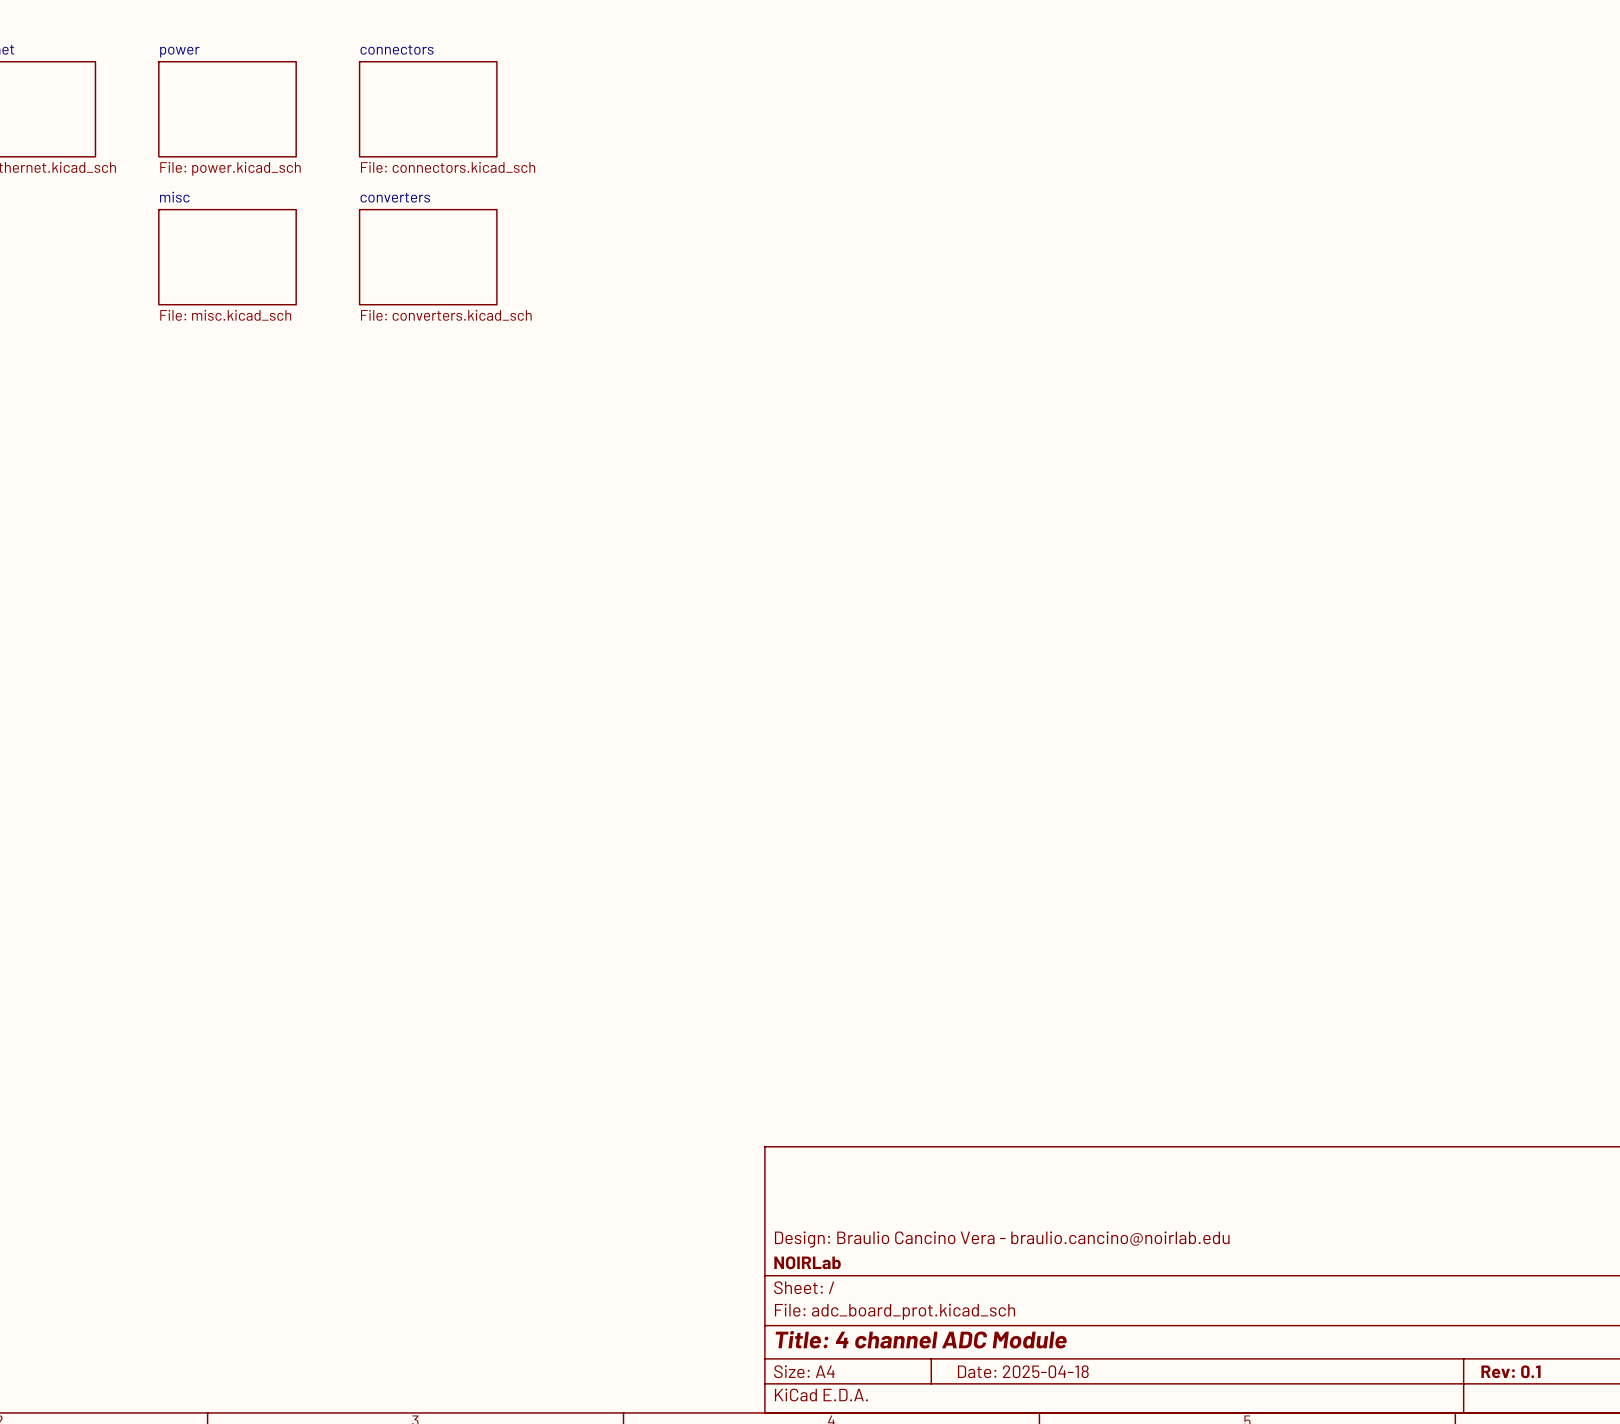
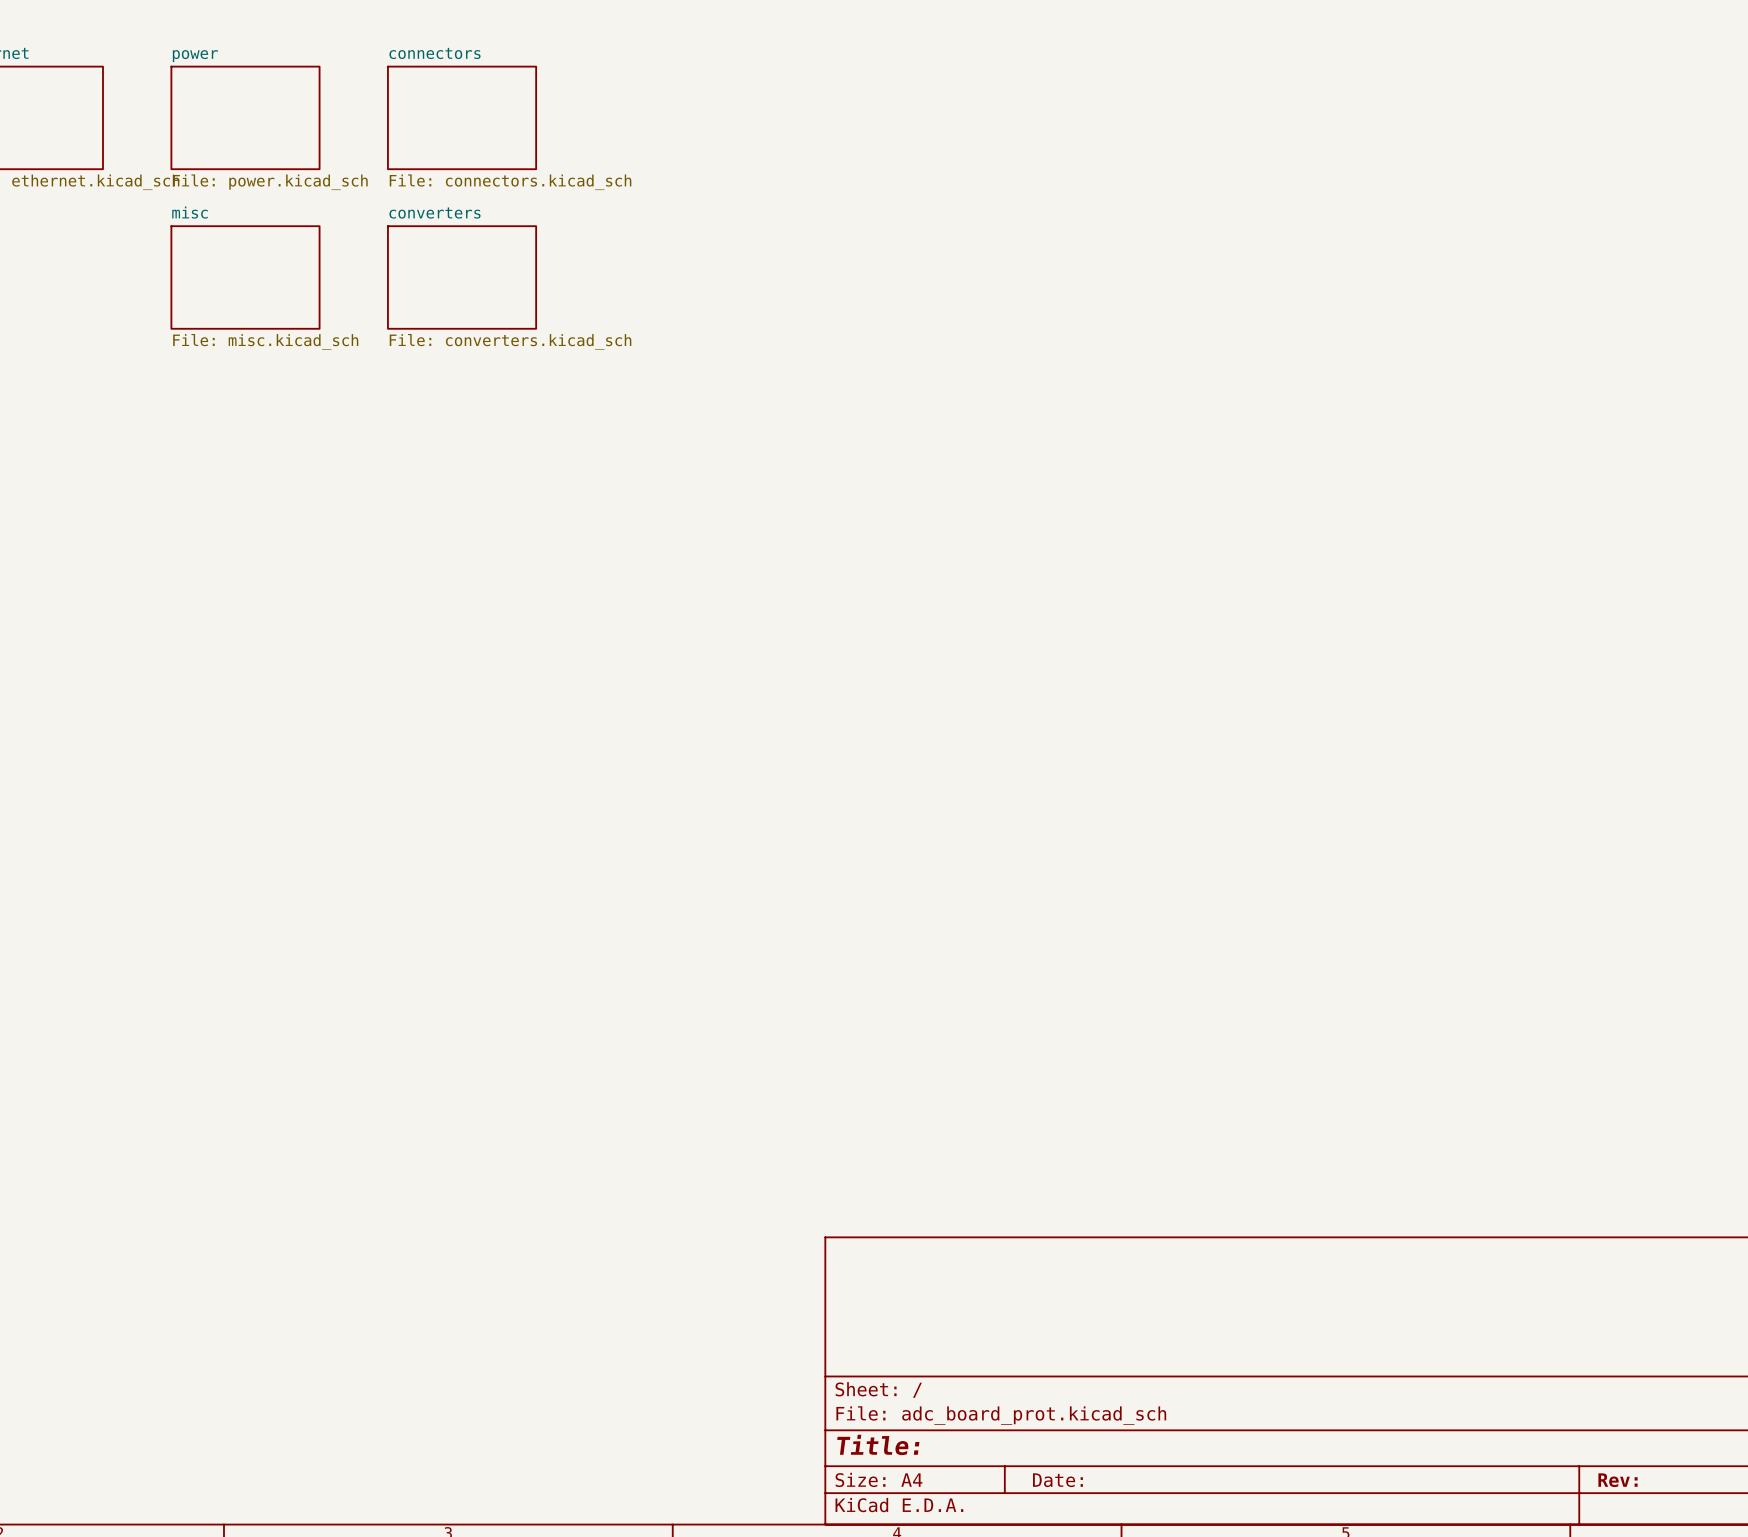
title block: Design: Braulio Cancino Vera - braulio.cancino@noirlab.edu (1002, 1239) -> none
title block: NOIRLab (807, 1262) -> none
title block: Title: 4 channel ADC Module (921, 1339) -> Title: (878, 1444)
title block: Date: 2025-04-18 (1023, 1371) -> Date: (1057, 1480)
title block: Rev: 0.1 (1510, 1371) -> Rev: (1618, 1480)

